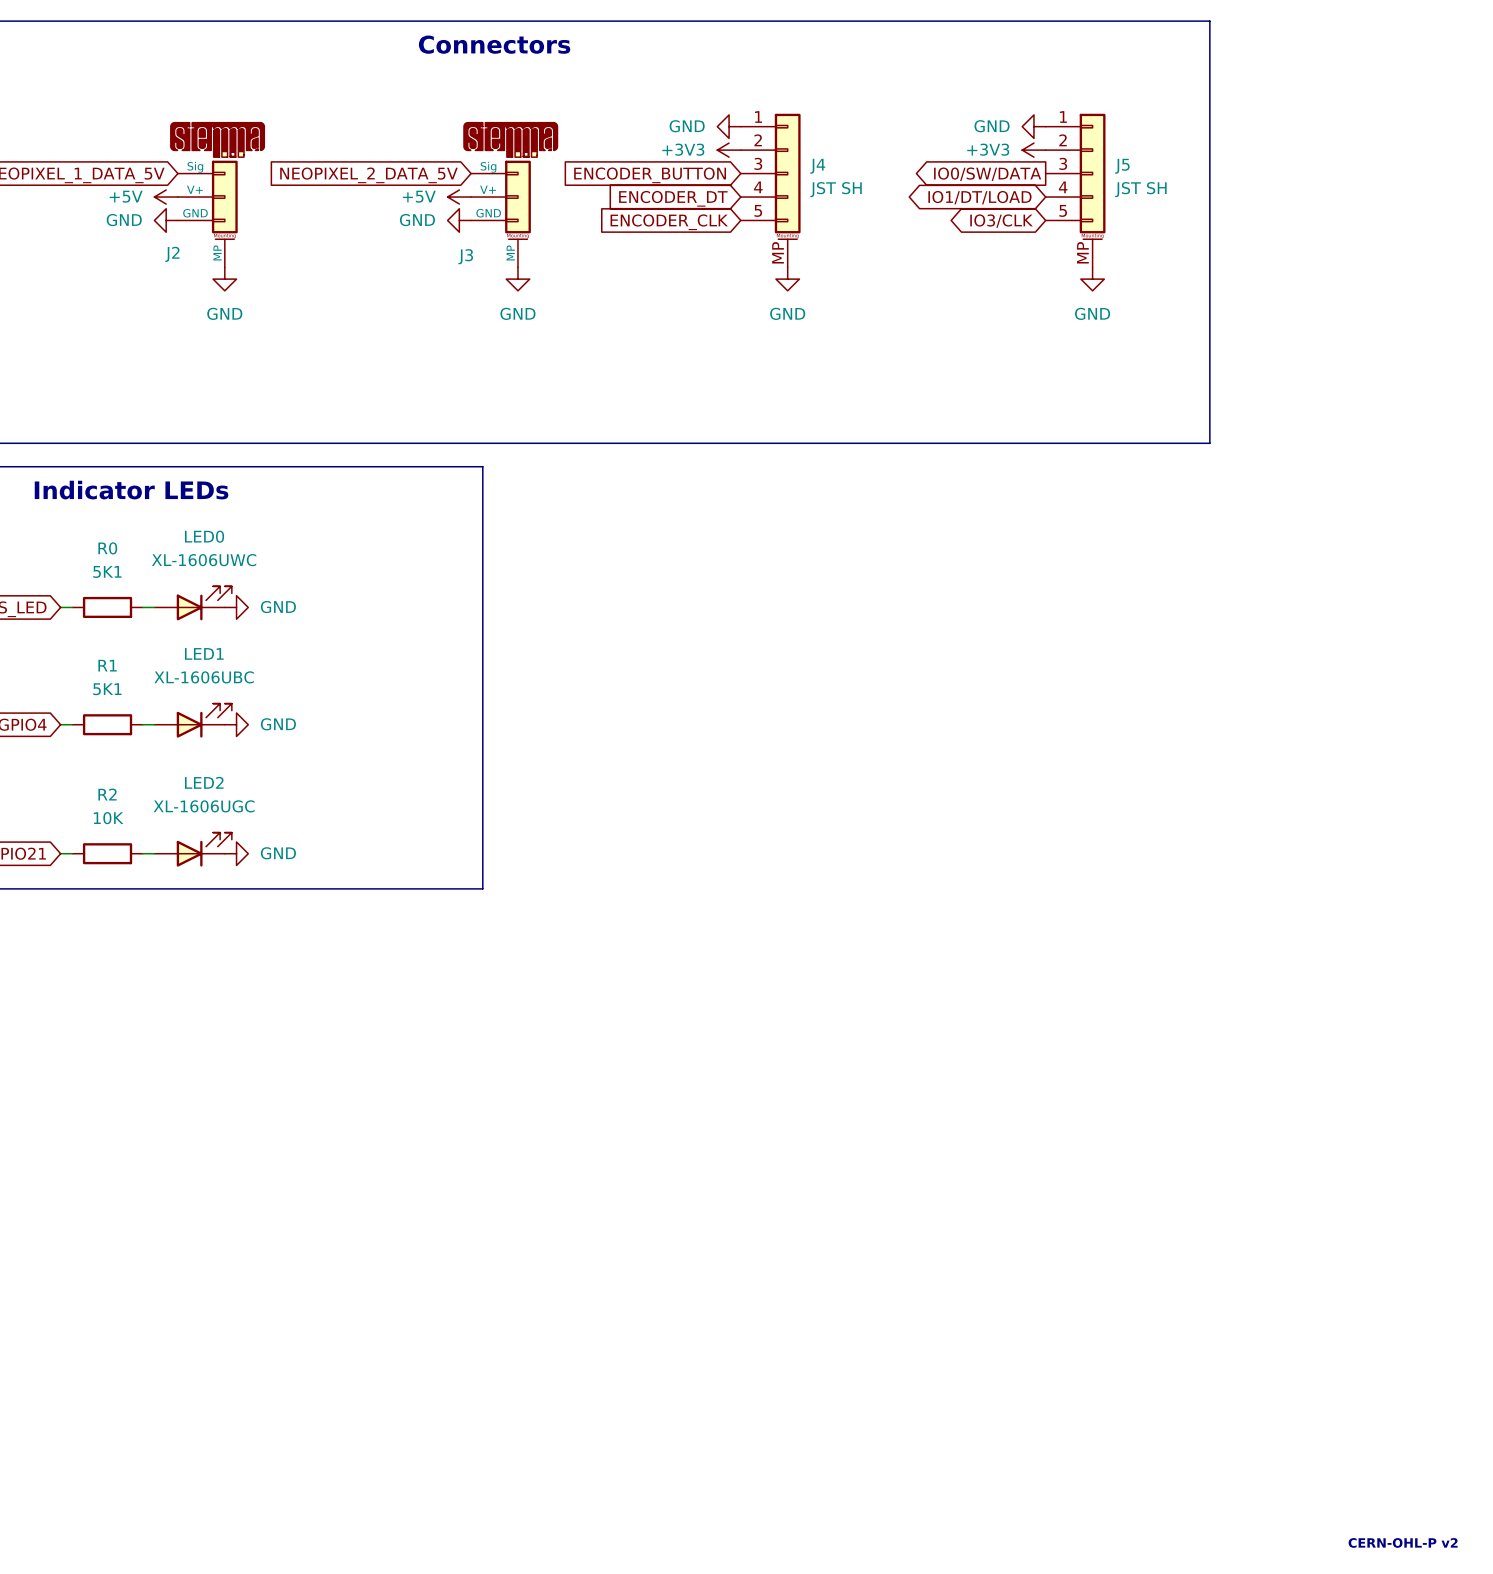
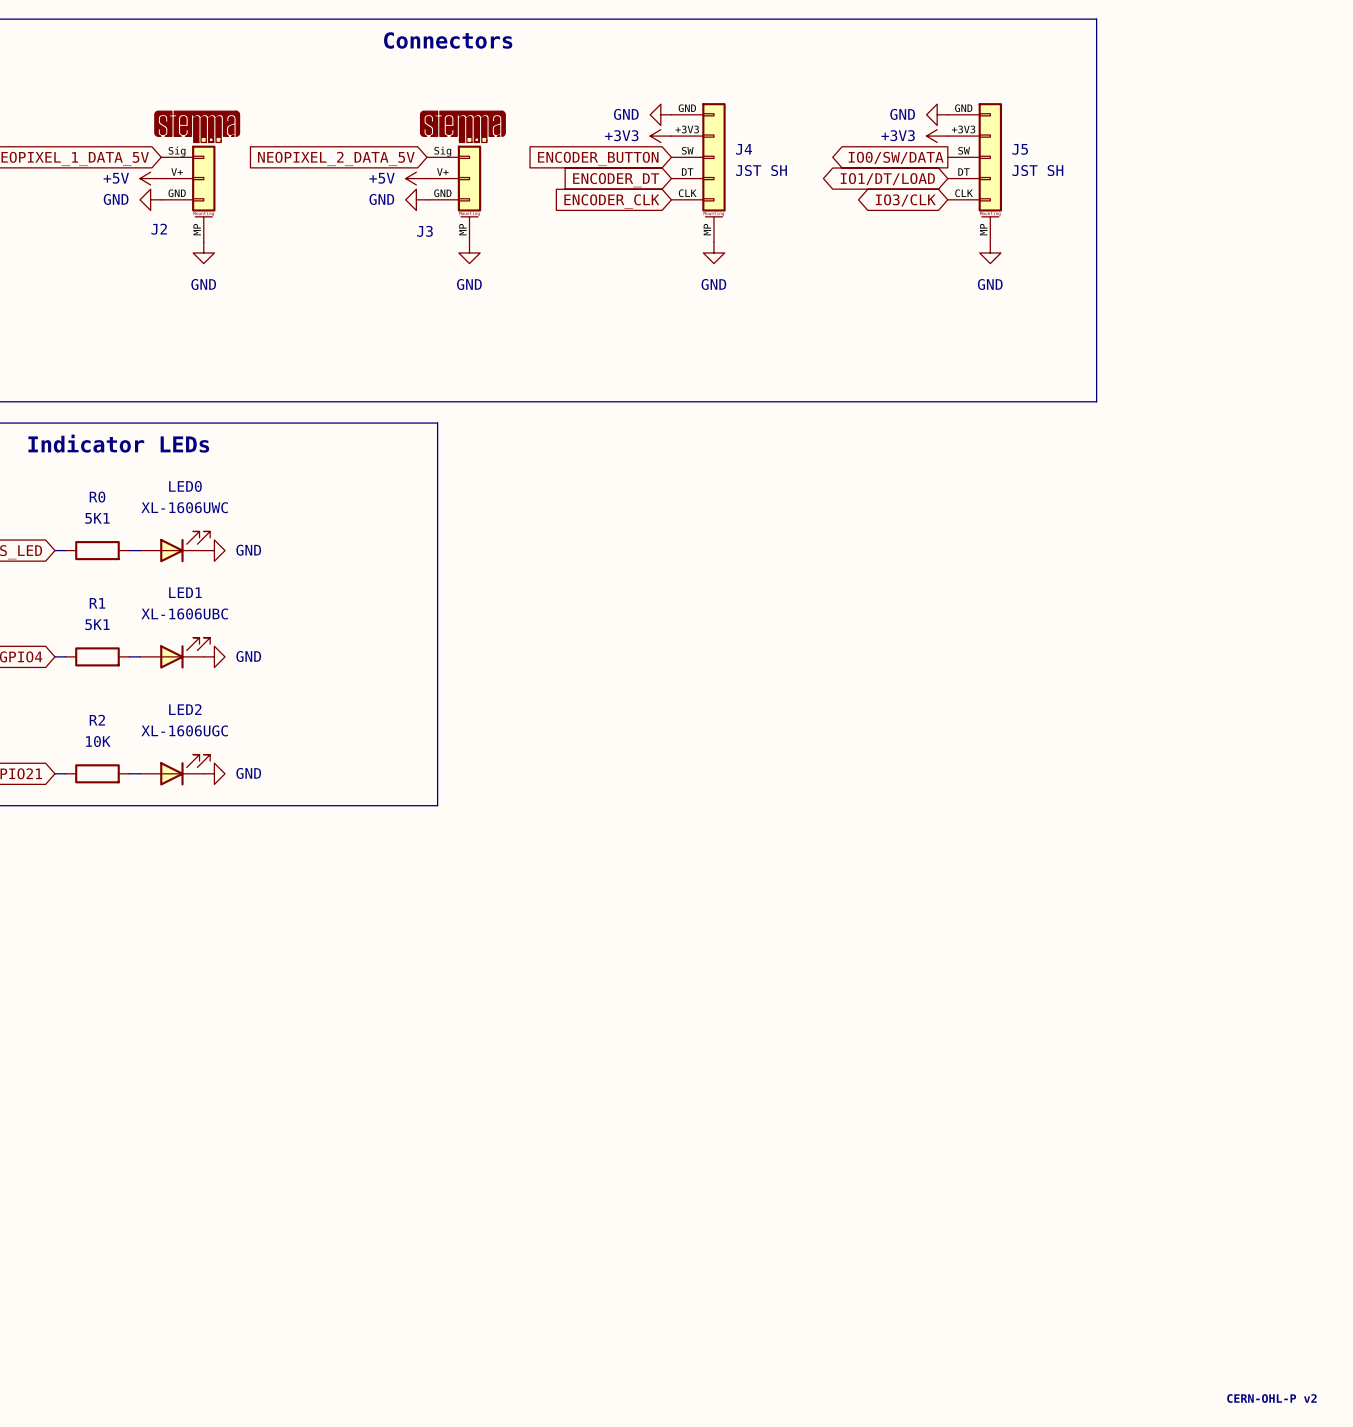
J4 symbol: [740, 113, 801, 268] -> [671, 103, 726, 243]
J5 symbol: [1045, 113, 1106, 268] -> [947, 103, 1003, 243]

